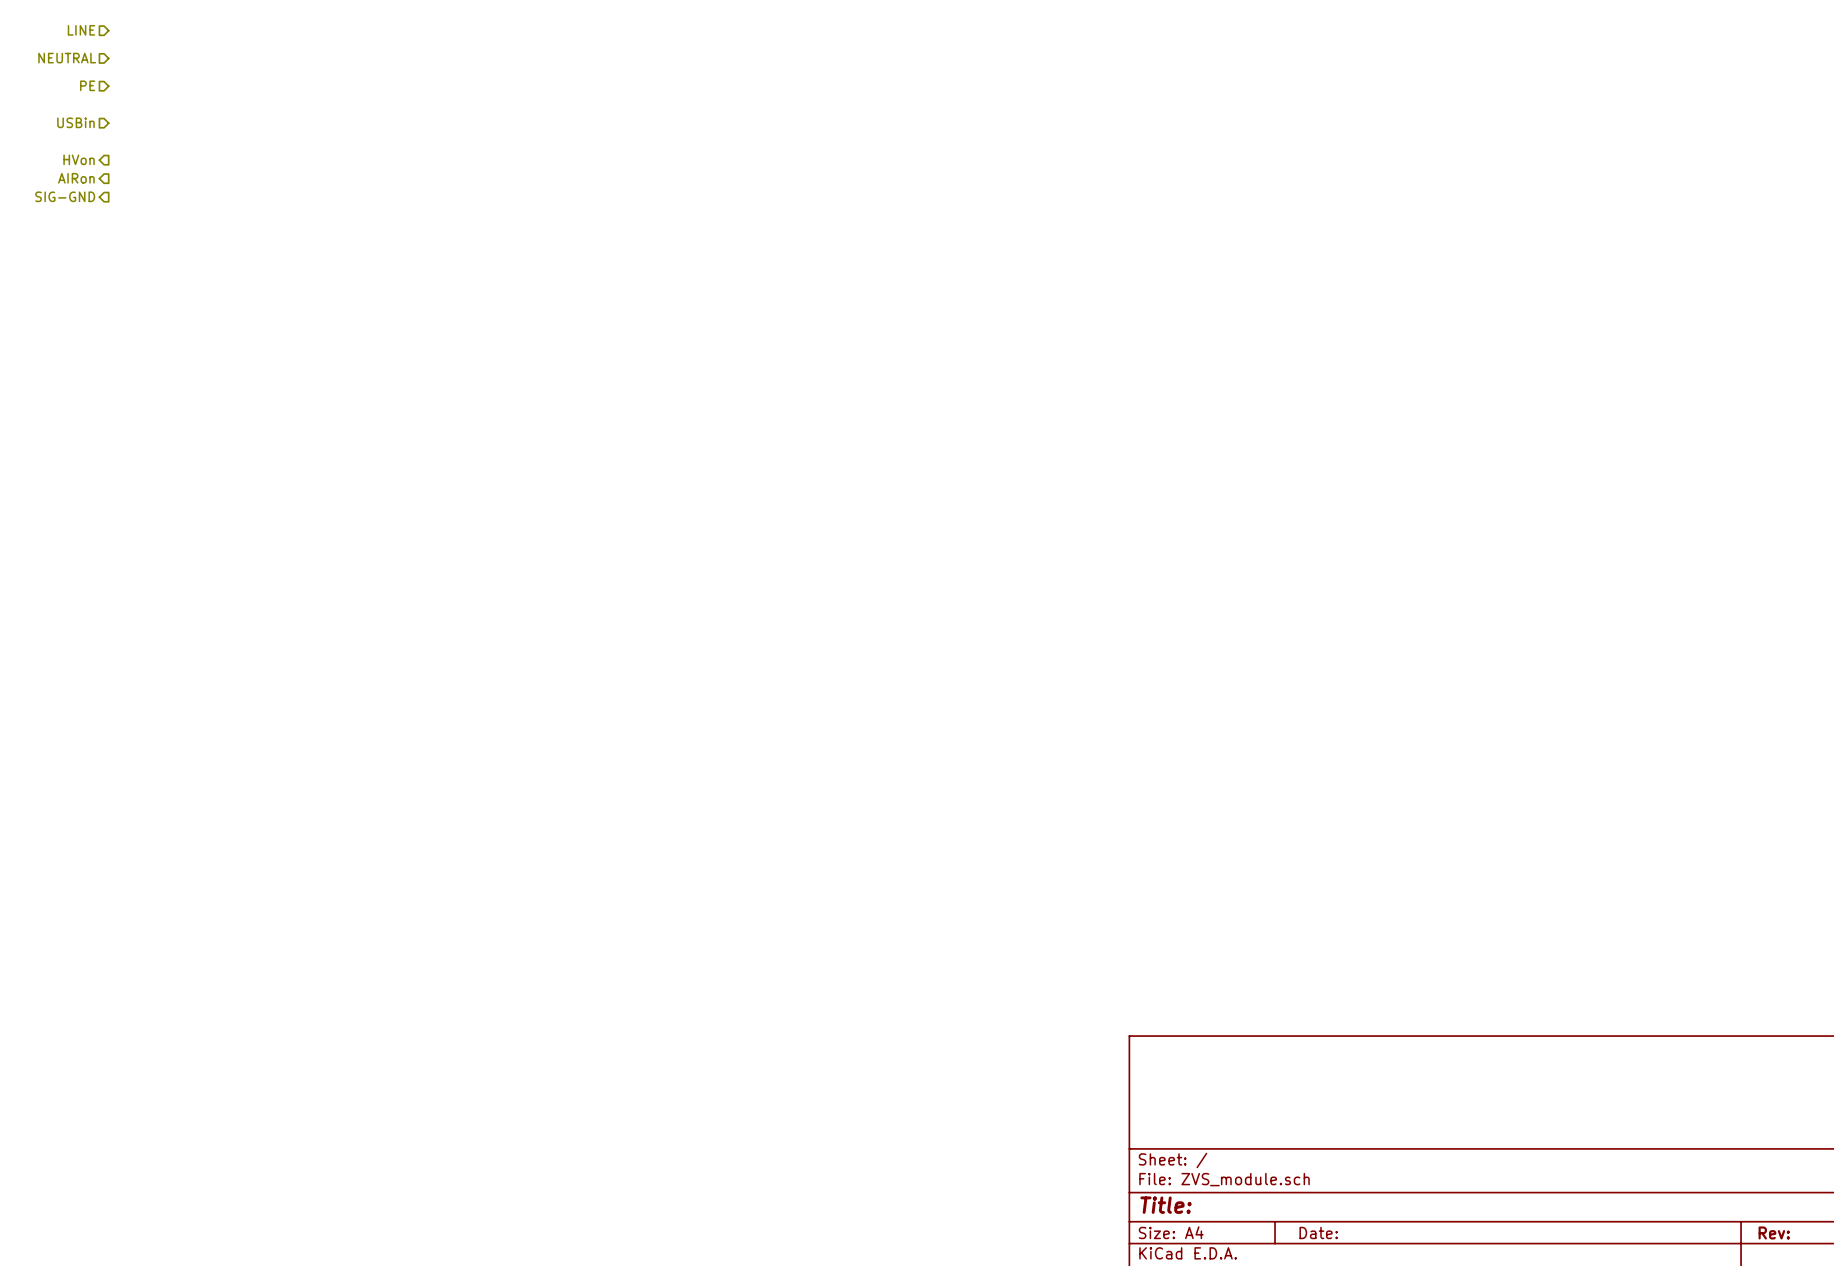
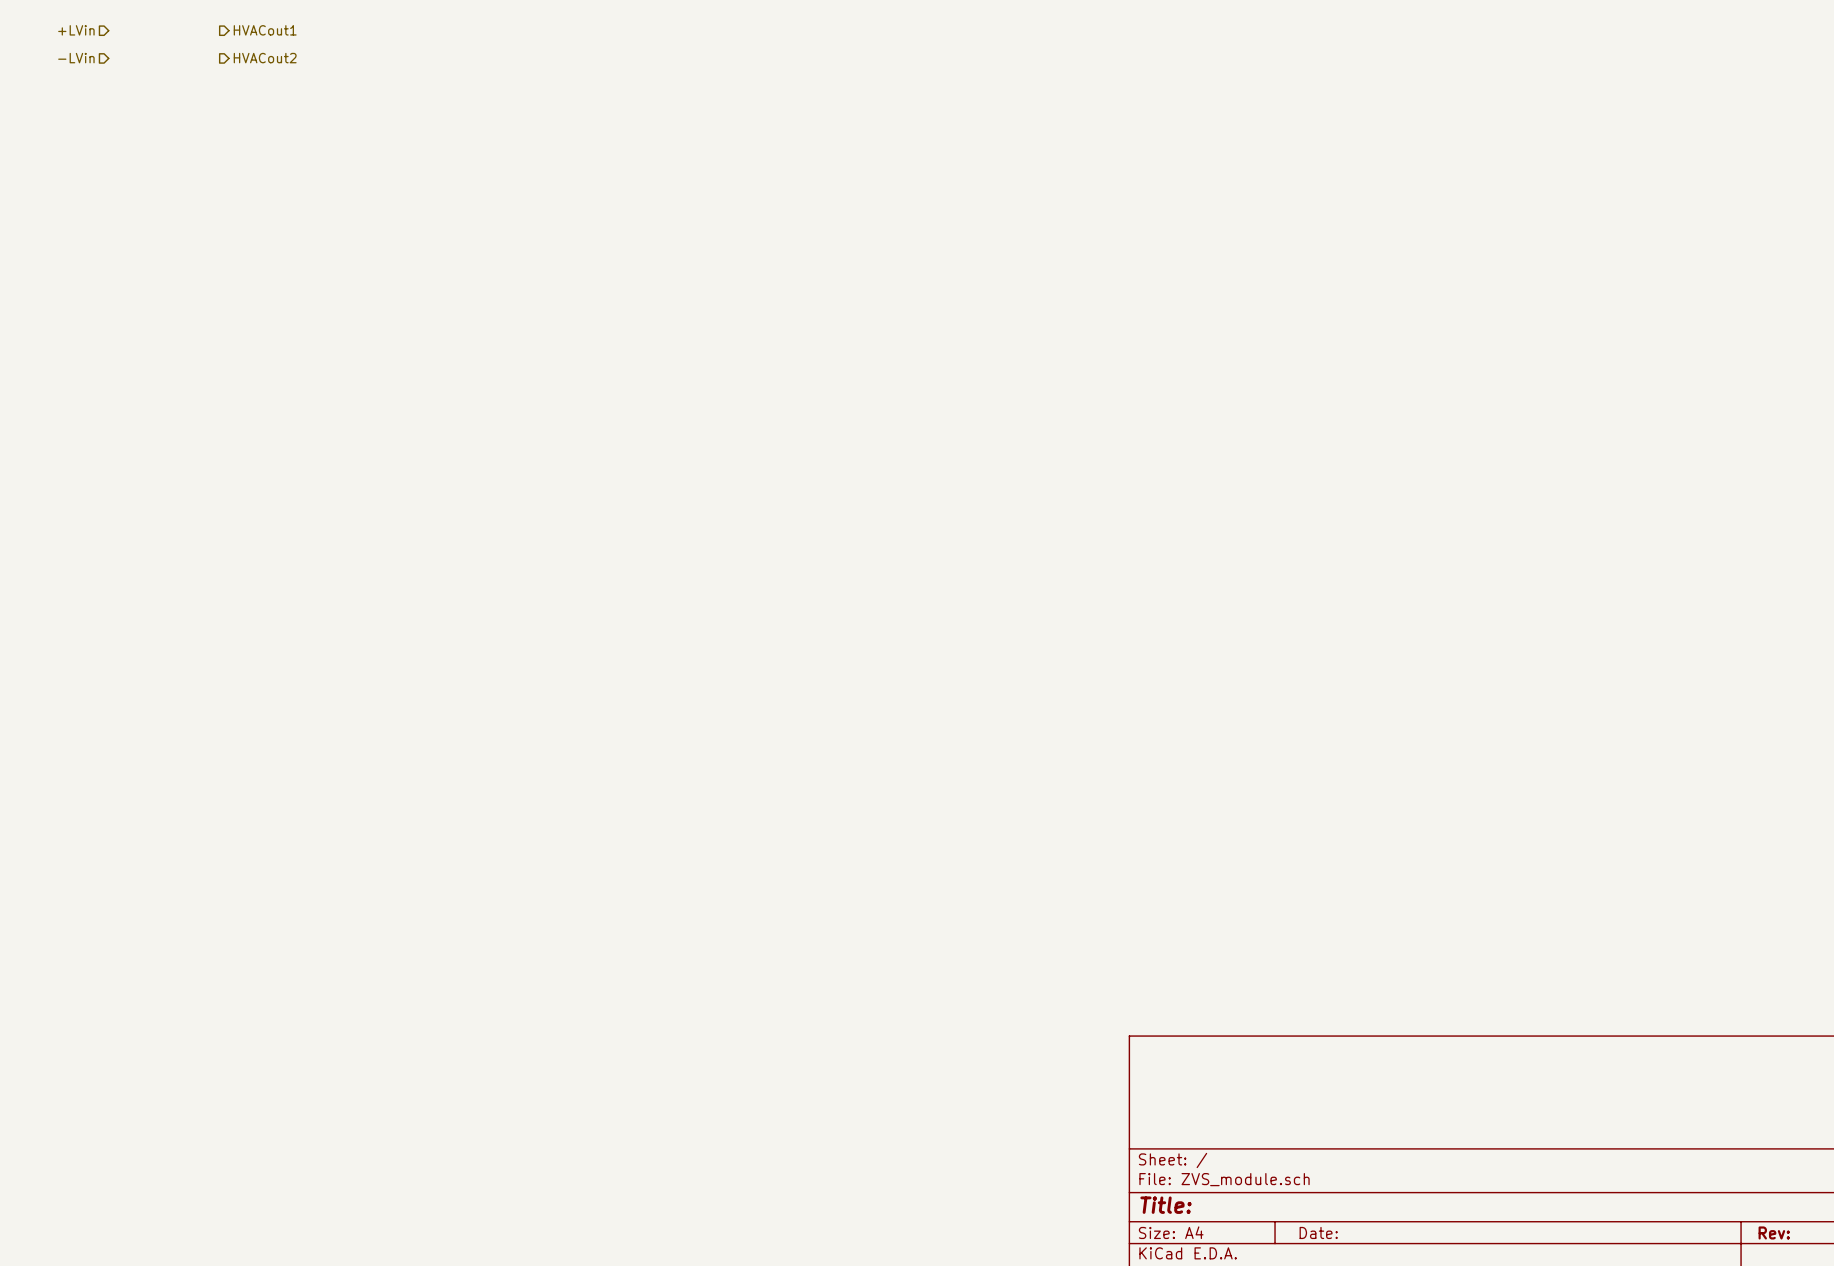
hierarchical label: LINE (81, 30) -> +LVin (76, 30)
hierarchical label: none -> HVACout1 (265, 30)
hierarchical label: NEUTRAL (67, 58) -> -LVin (76, 58)
hierarchical label: none -> HVACout2 (265, 58)
hierarchical label: PE (87, 85) -> none
hierarchical label: USBin (75, 122) -> none
hierarchical label: HVon (79, 159) -> none
hierarchical label: AIRon (76, 178) -> none
hierarchical label: SIG-GND (65, 196) -> none

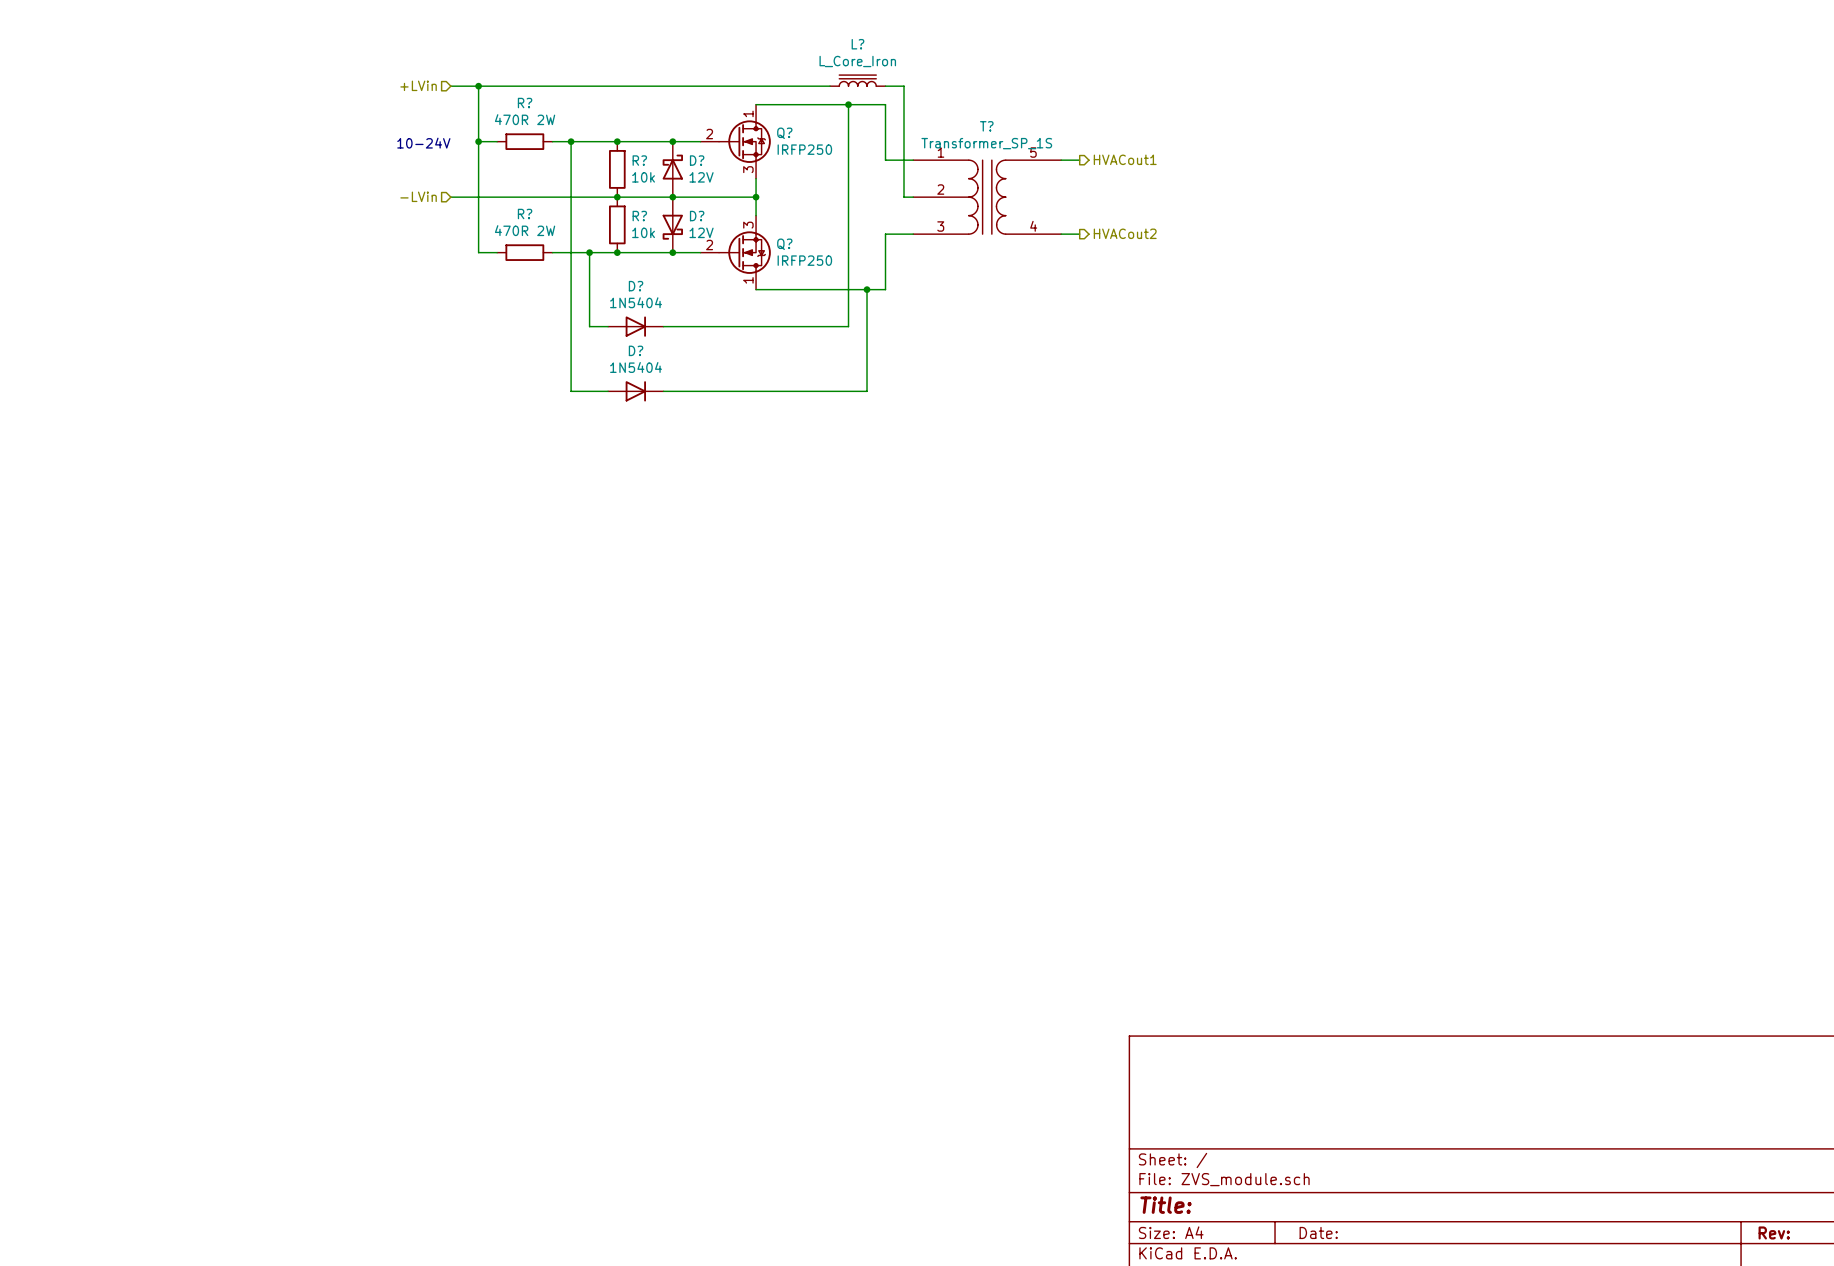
hierarchical label: +LVin (76, 30) -> none
hierarchical label: HVACout1 (265, 30) -> none
hierarchical label: -LVin (76, 58) -> none
hierarchical label: HVACout2 (265, 58) -> none
L?: none -> L_Core_Iron (857, 80)
hierarchical label: none -> +LVin (418, 85)
wire: none -> (450, 86) (830, 86)
wire: none -> (478, 86) (478, 252) (497, 252)
junction: none -> (478, 86)
wire: none -> (885, 86) (904, 86) (904, 197) (913, 197)
wire: none -> (756, 104) (885, 104) (885, 160) (913, 160)
wire: none -> (848, 104) (848, 326) (663, 326)
junction: none -> (848, 104)
wire: none -> (478, 141) (497, 141)
junction: none -> (478, 141)
R?: none -> 470R 2W (524, 141)
wire: none -> (552, 141) (700, 141)
wire: none -> (571, 141) (571, 391) (608, 391)
junction: none -> (571, 141)
junction: none -> (617, 141)
junction: none -> (672, 141)
Q?: none -> IRFP250 (735, 141)
text: none -> 10-24V (423, 143)
hierarchical label: none -> HVACout1 (1125, 159)
wire: none -> (1061, 160) (1079, 160)
R?: none -> 10k (617, 169)
D?: none -> 12V (672, 169)
wire: none -> (756, 178) (756, 215)
hierarchical label: none -> -LVin (418, 196)
wire: none -> (450, 197) (756, 197)
junction: none -> (617, 197)
junction: none -> (672, 197)
junction: none -> (756, 197)
T?: none -> Transformer_SP_1S (987, 197)
R?: none -> 10k (617, 224)
D?: none -> 12V (672, 224)
hierarchical label: none -> HVACout2 (1125, 233)
wire: none -> (913, 234) (885, 234) (885, 289) (756, 289)
wire: none -> (1061, 234) (1079, 234)
R?: none -> 470R 2W (524, 252)
wire: none -> (552, 252) (700, 252)
wire: none -> (589, 252) (589, 326) (608, 326)
junction: none -> (589, 252)
junction: none -> (617, 252)
junction: none -> (672, 252)
Q?: none -> IRFP250 (735, 252)
wire: none -> (867, 289) (867, 391) (663, 391)
junction: none -> (867, 289)
D?: none -> 1N5404 (635, 326)
D?: none -> 1N5404 (635, 391)

